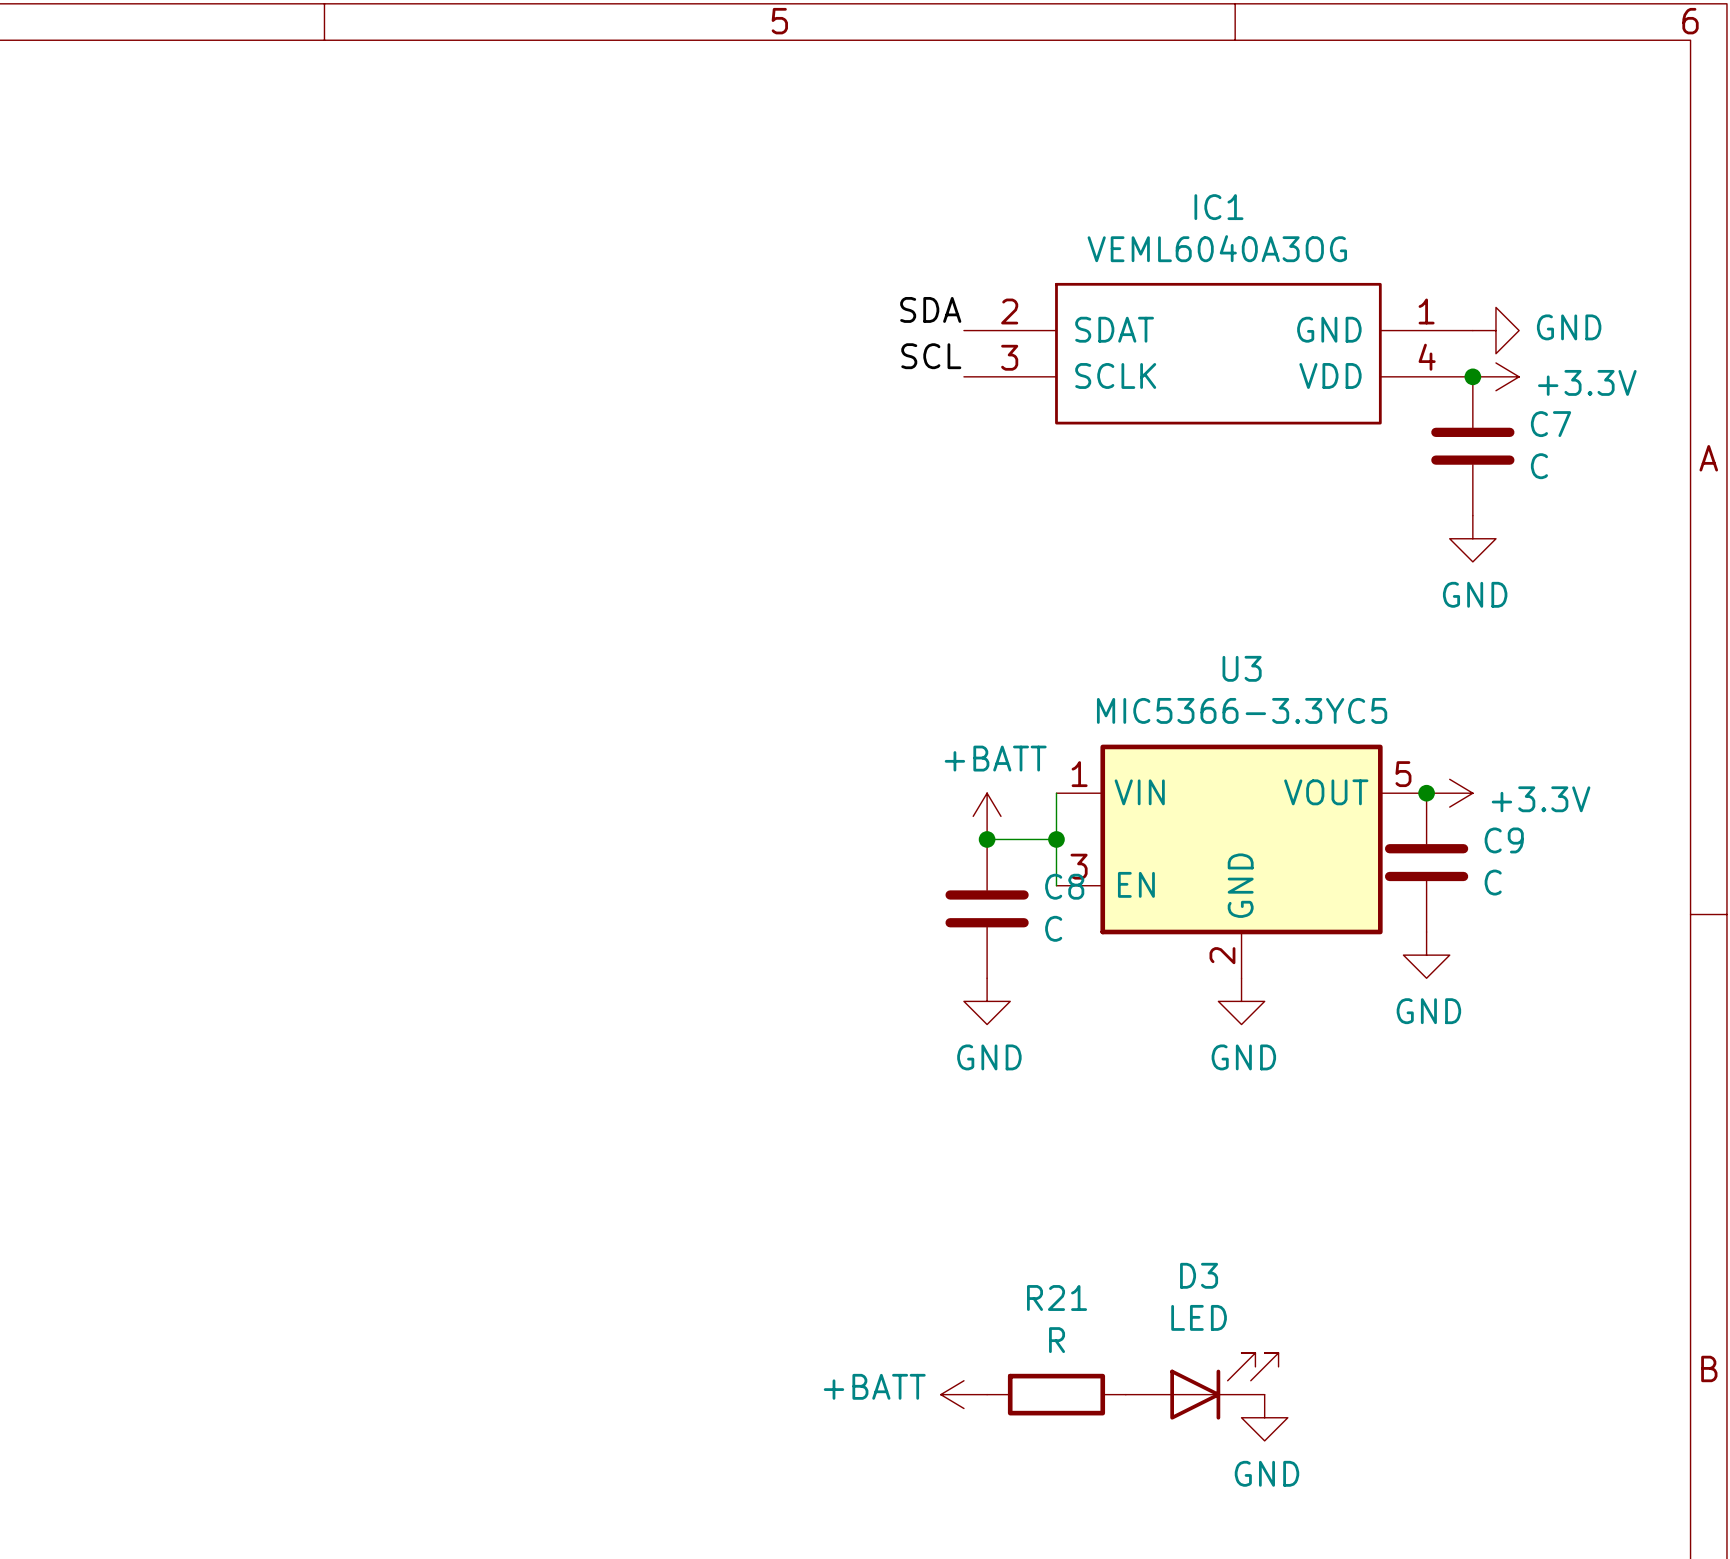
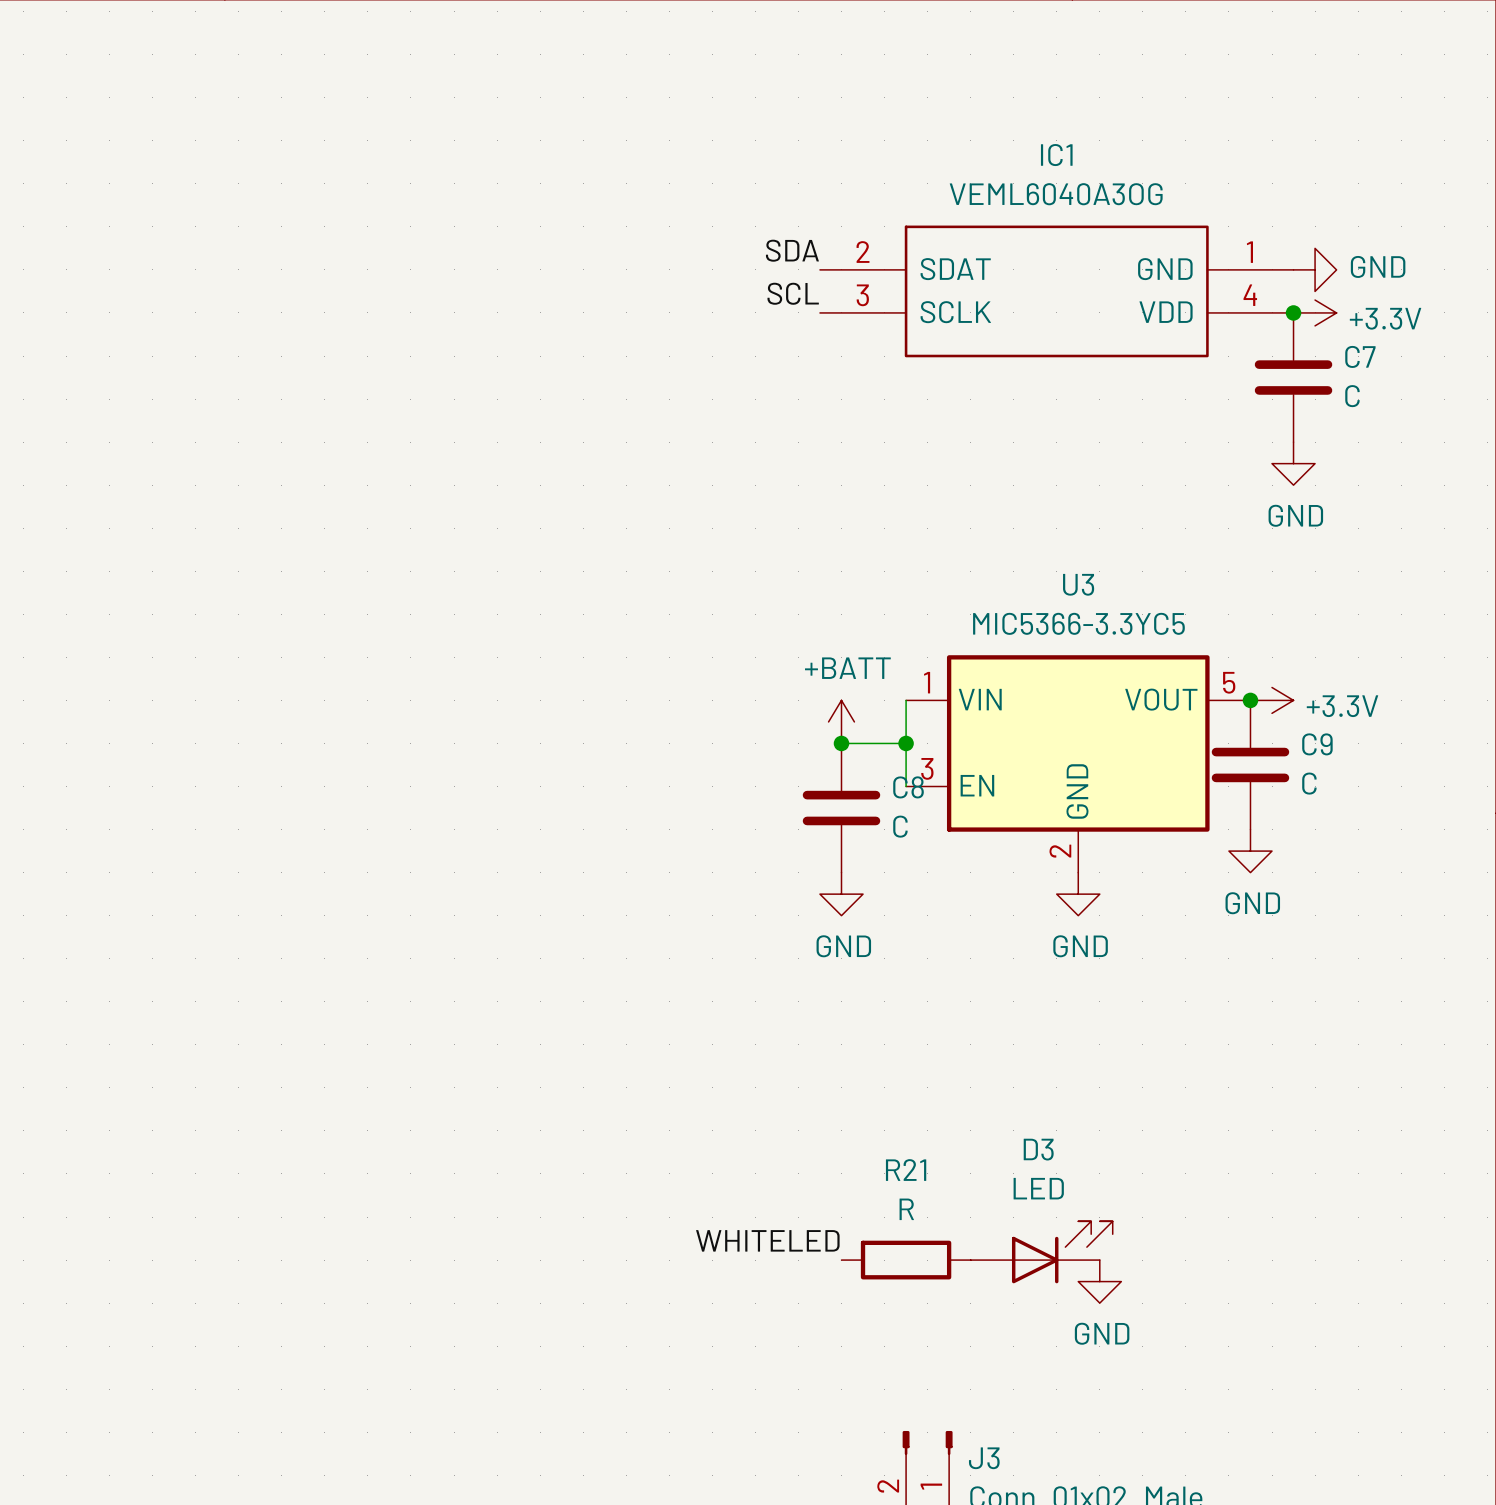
label: none -> WHITELED (767, 1240)
power symbol: +BATT (963, 1394) -> none

